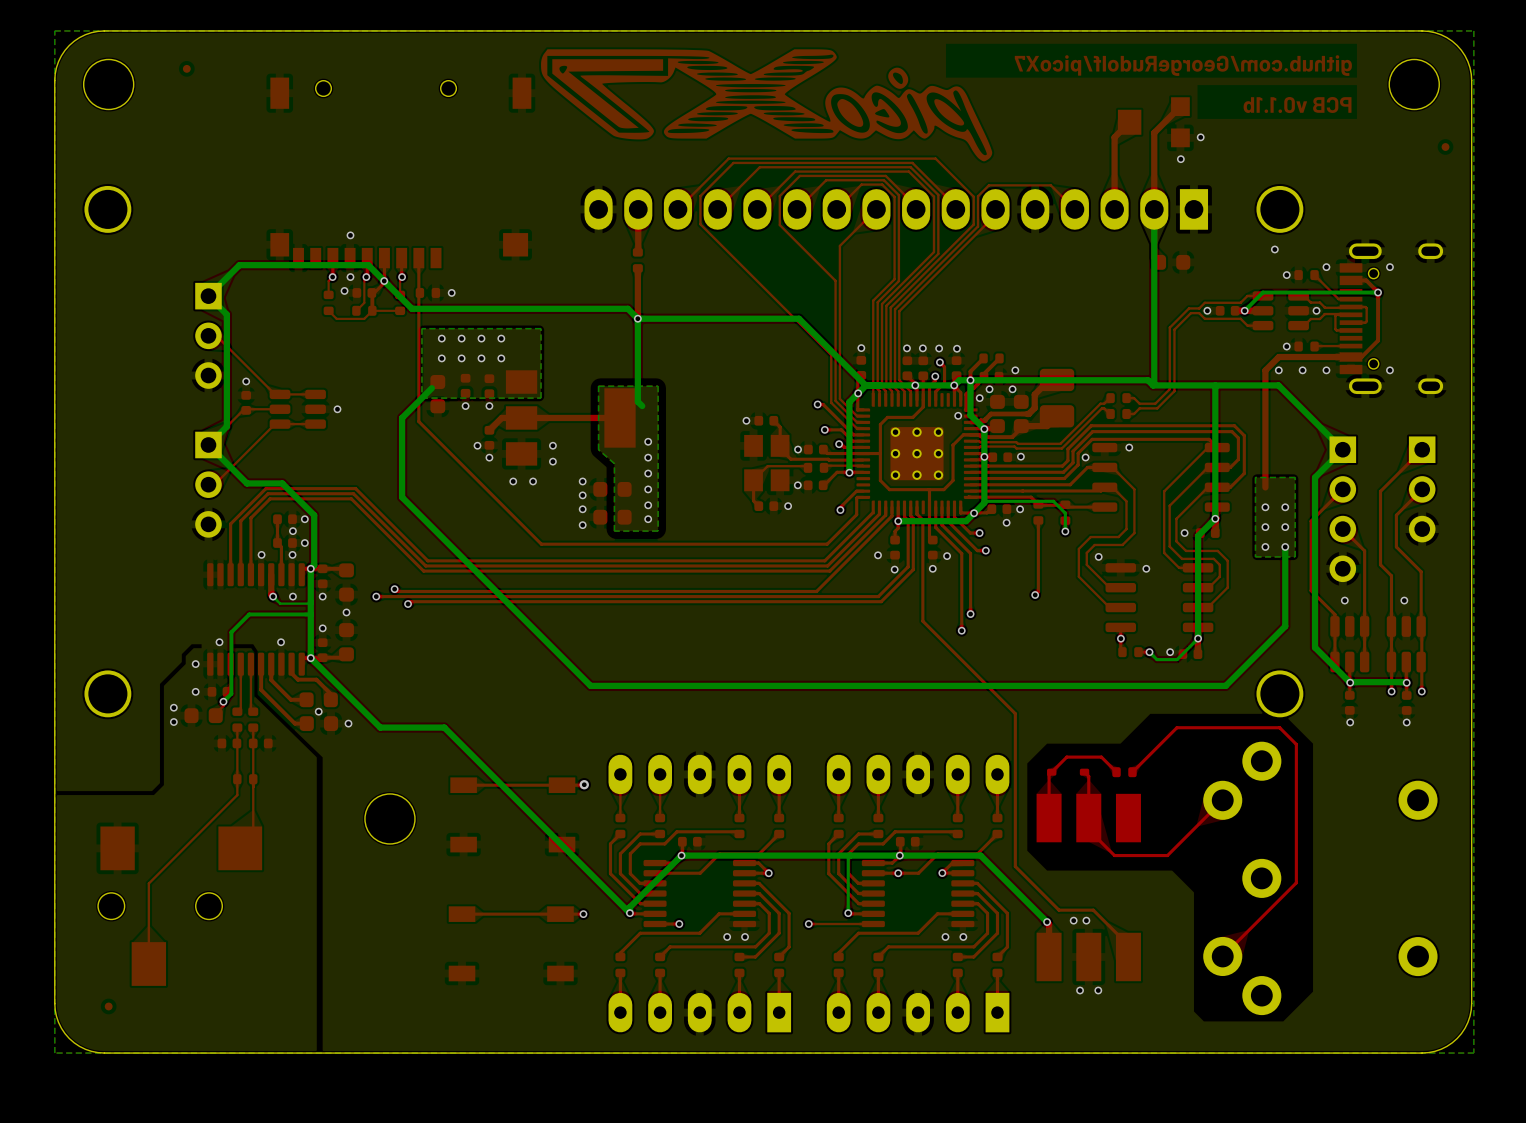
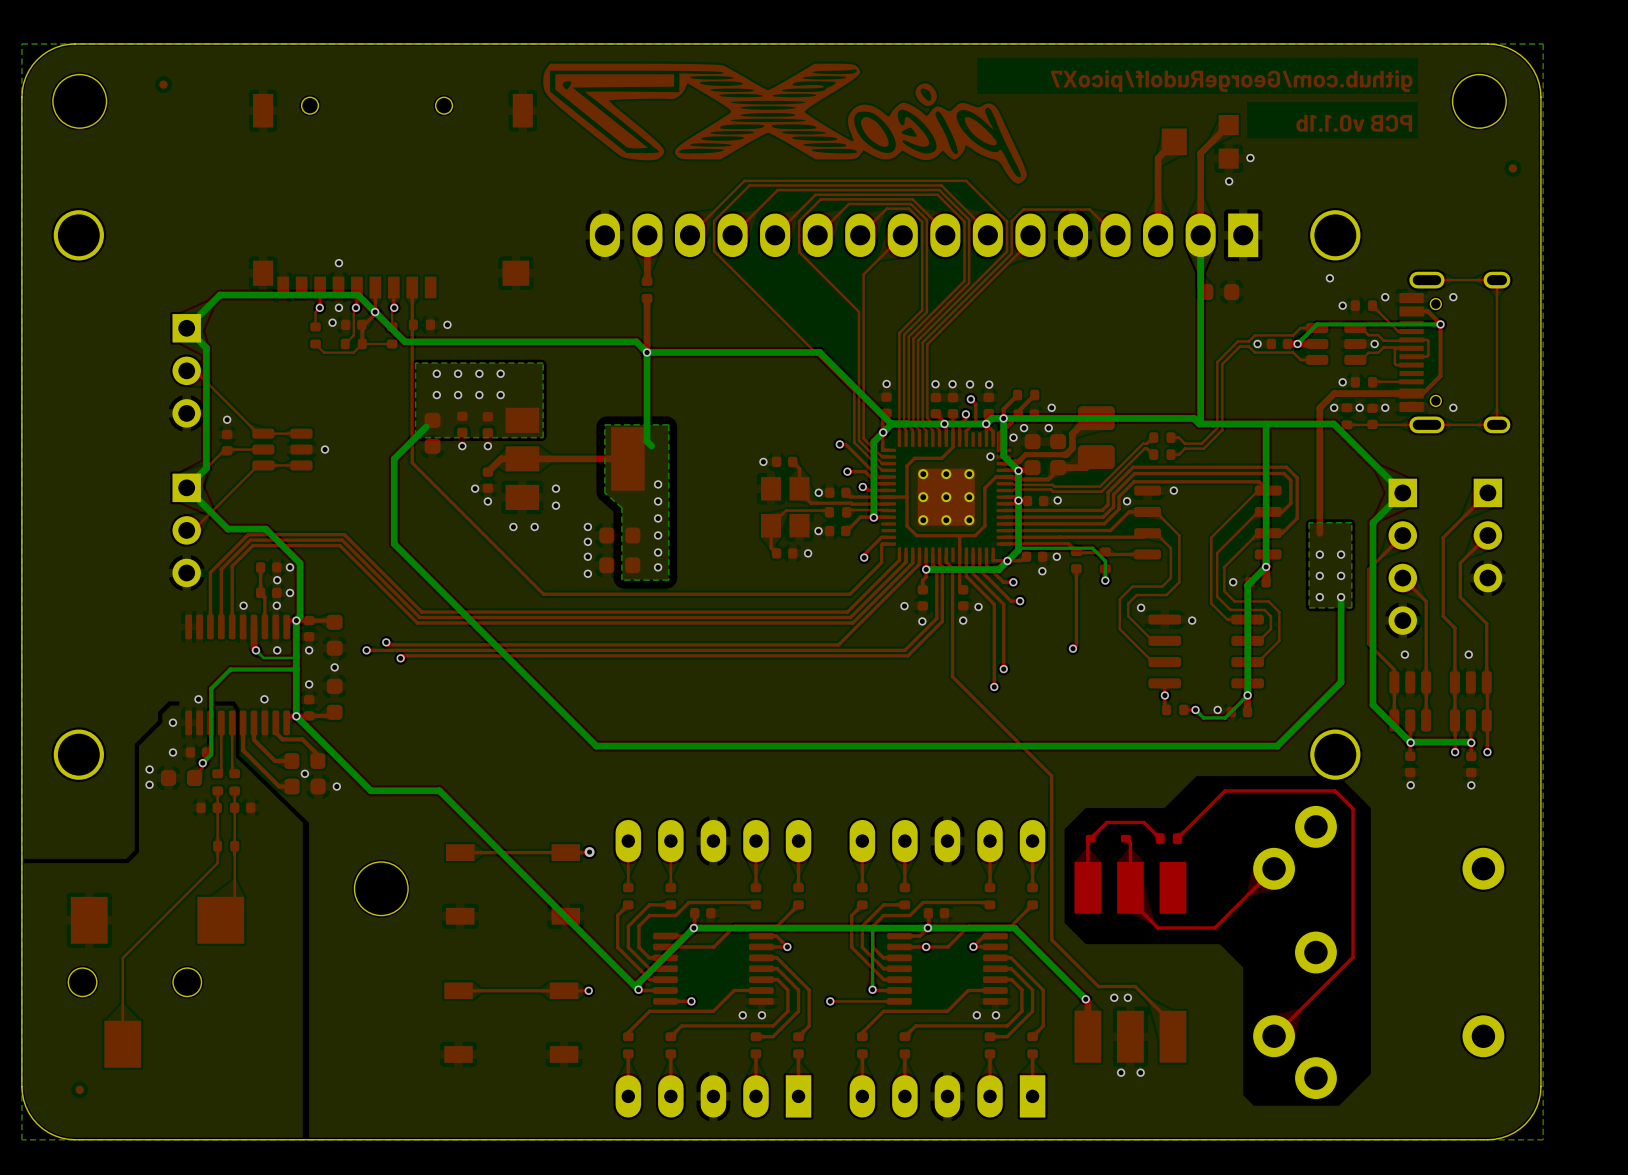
top track: none -> (1426, 280) (1496, 280) (1496, 424) (1346, 424)
part: none -> (1346, 416)
part: none -> (1372, 416)

